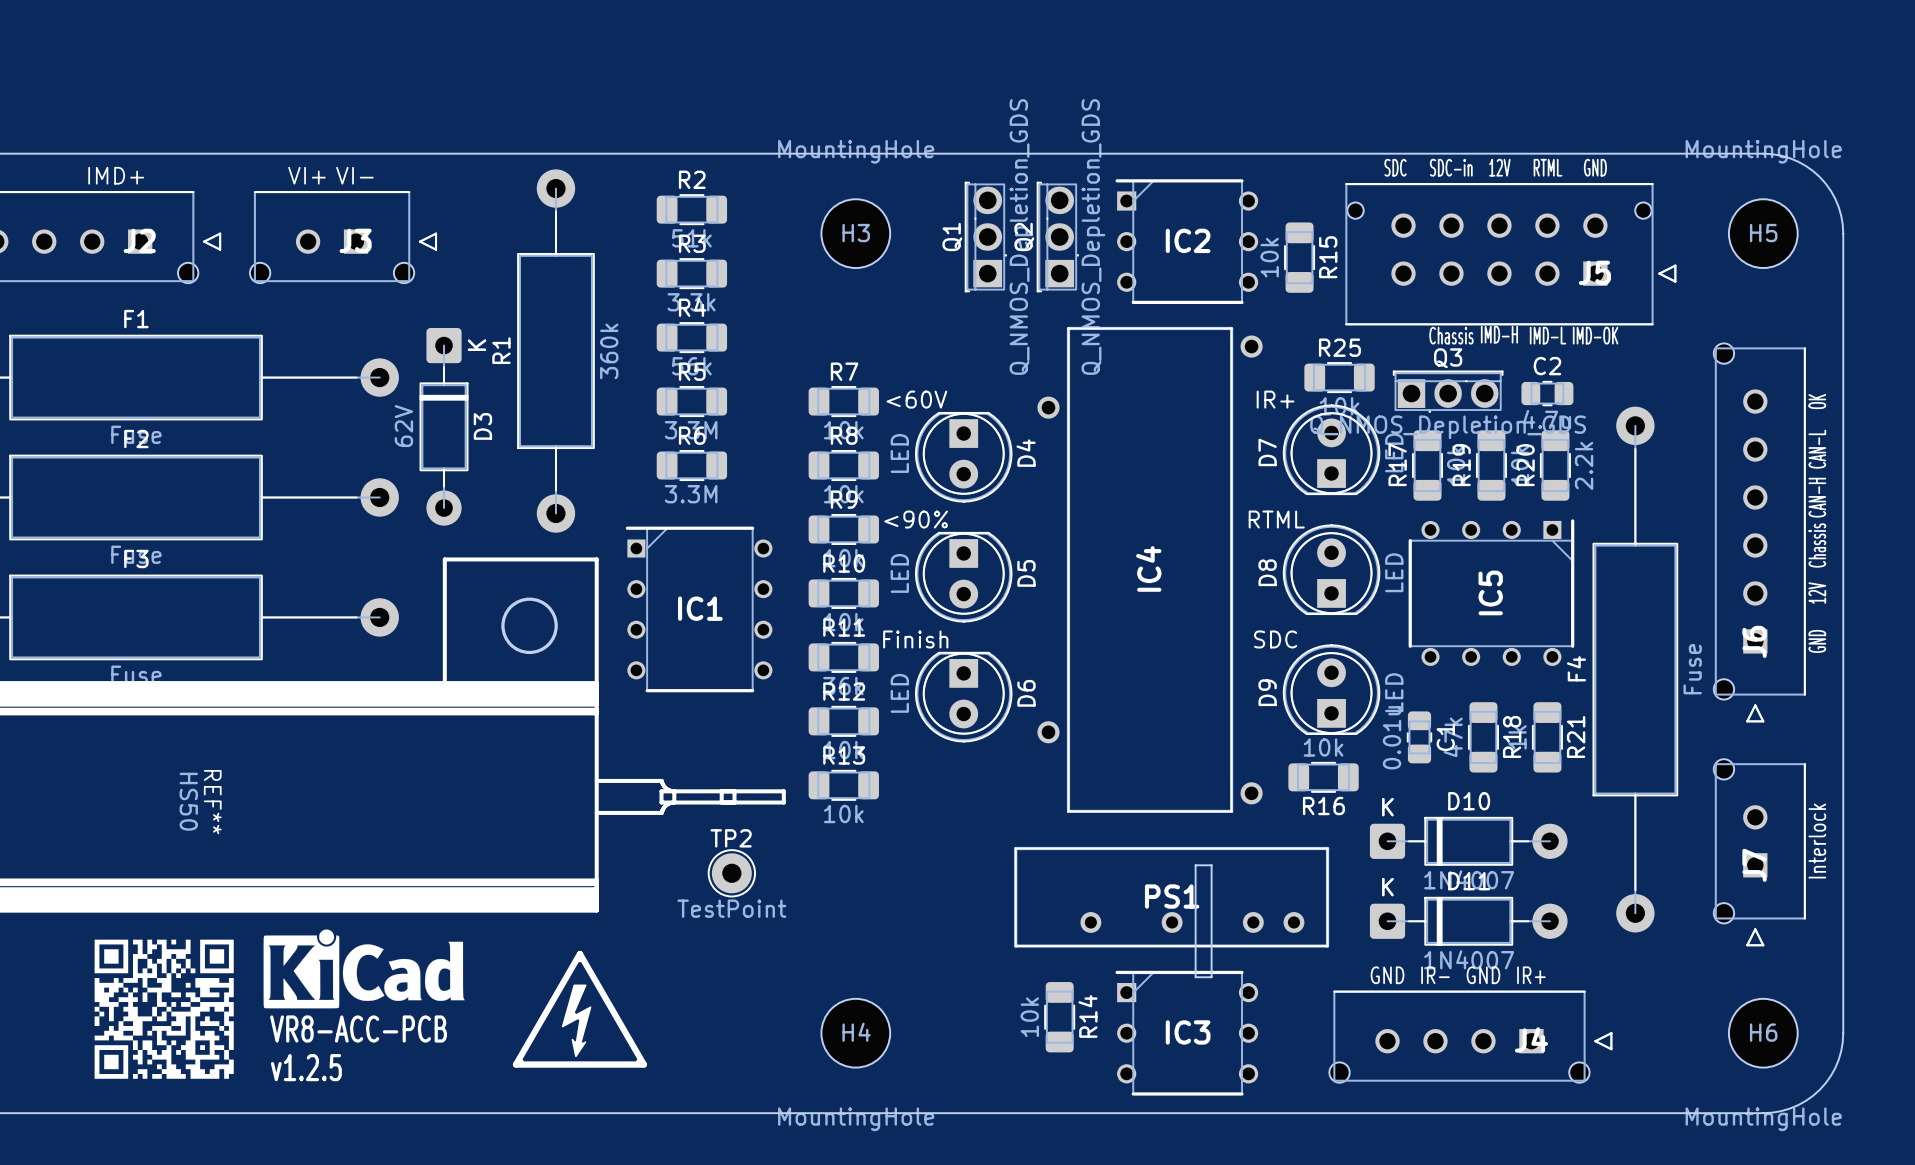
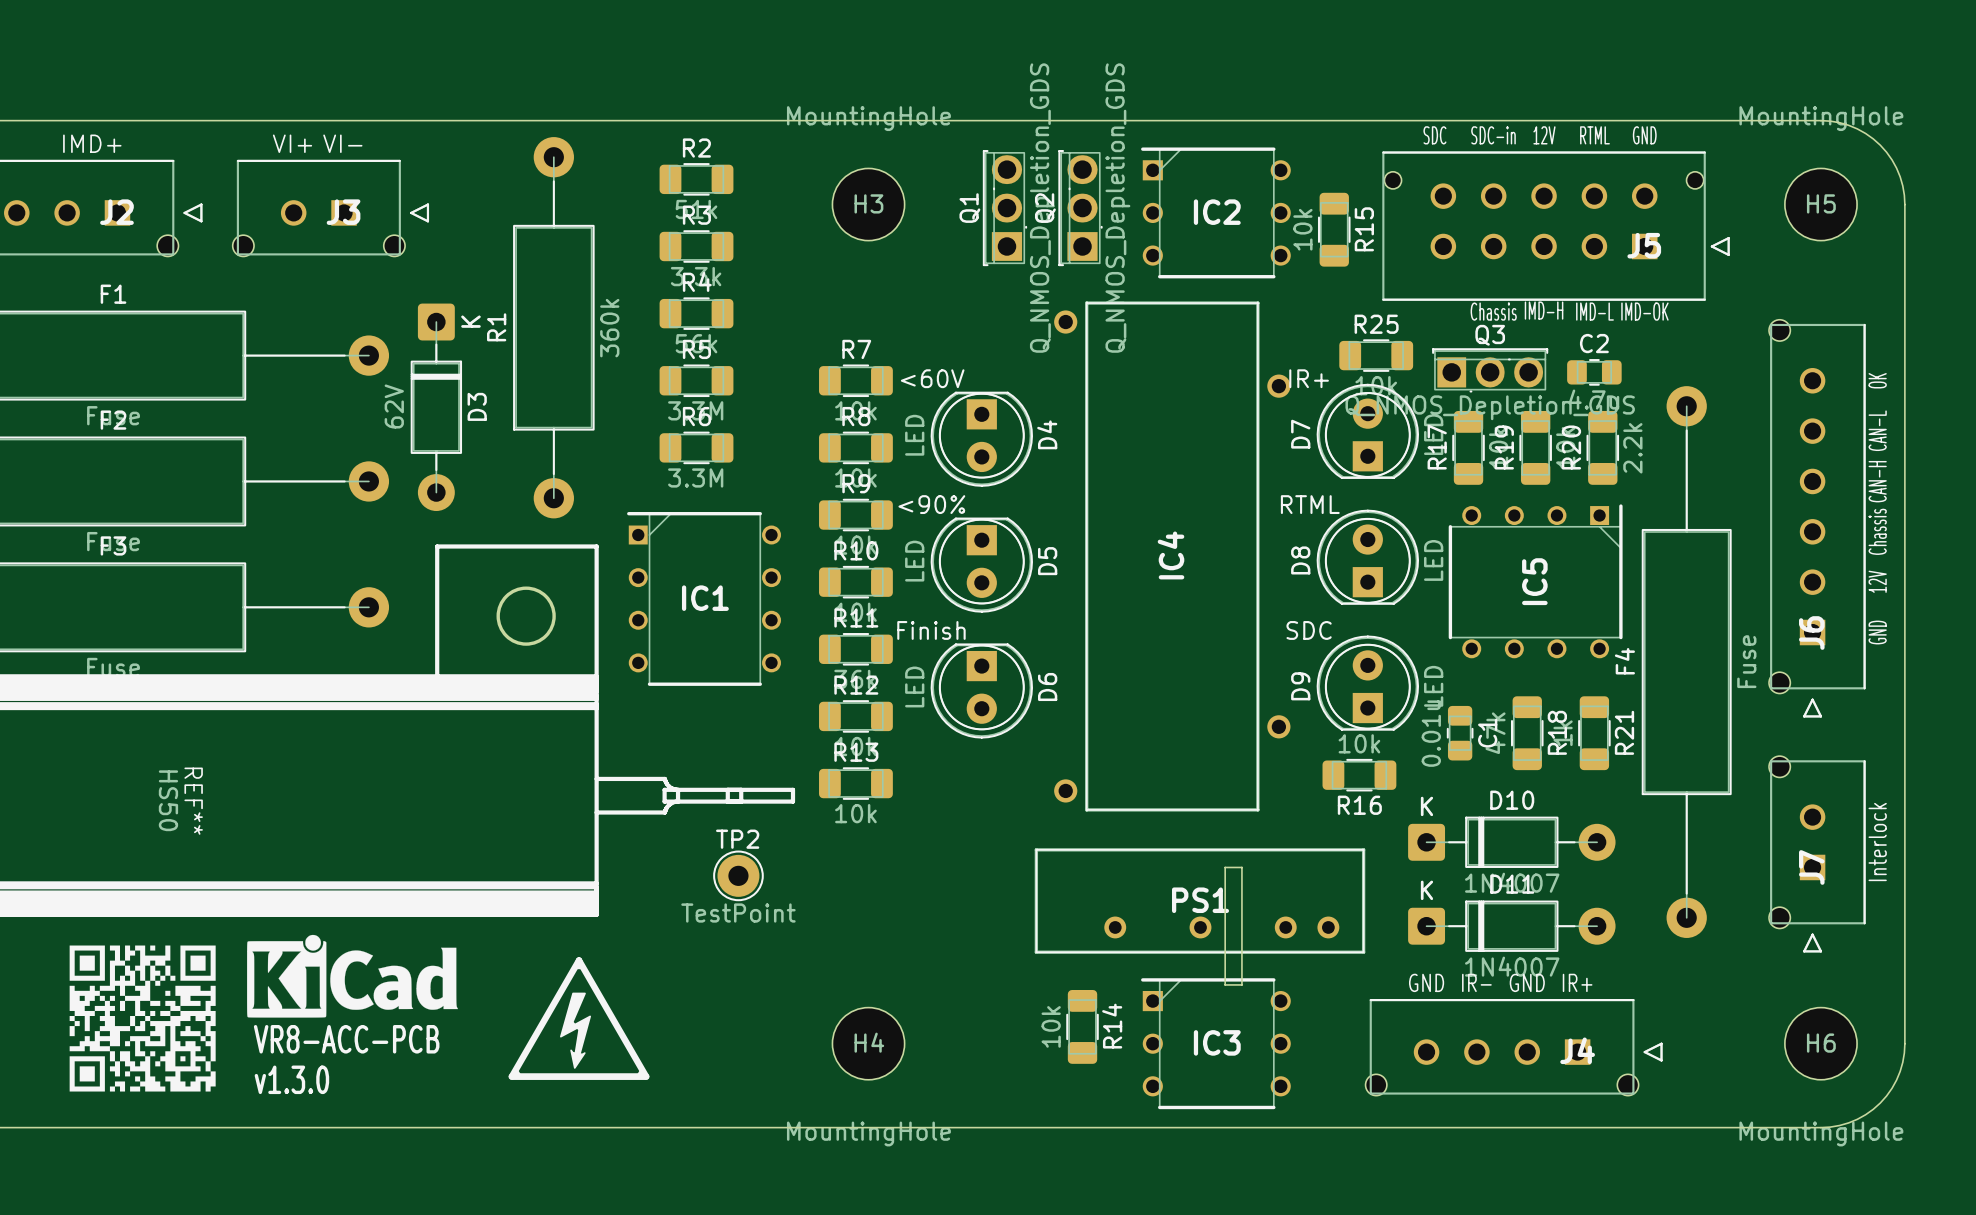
IC4 rotation: 0° (1150, 569) -> 180° (1172, 556)
text: v1.2.5 (306, 1067) -> v1.3.0 (291, 1079)

